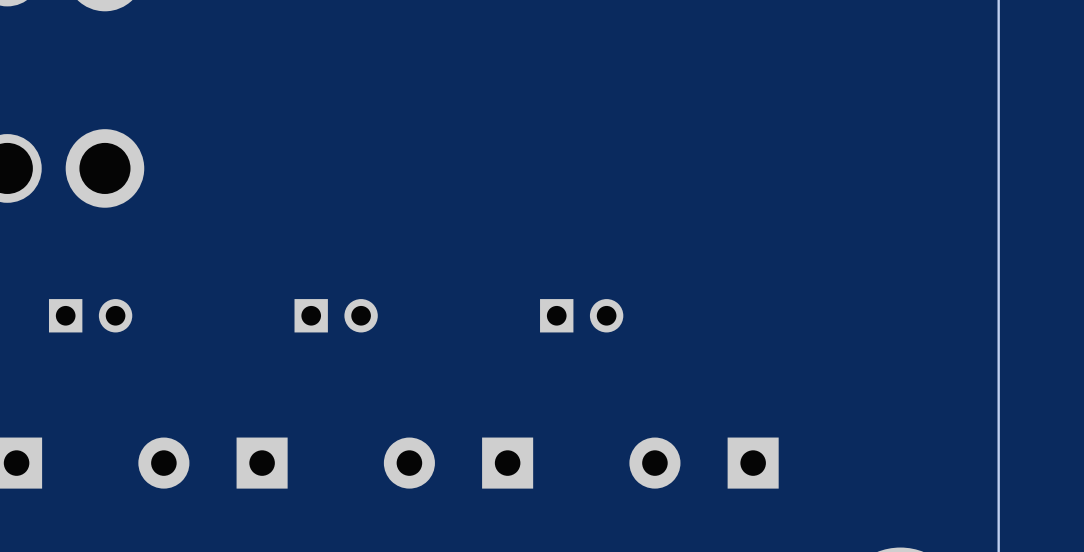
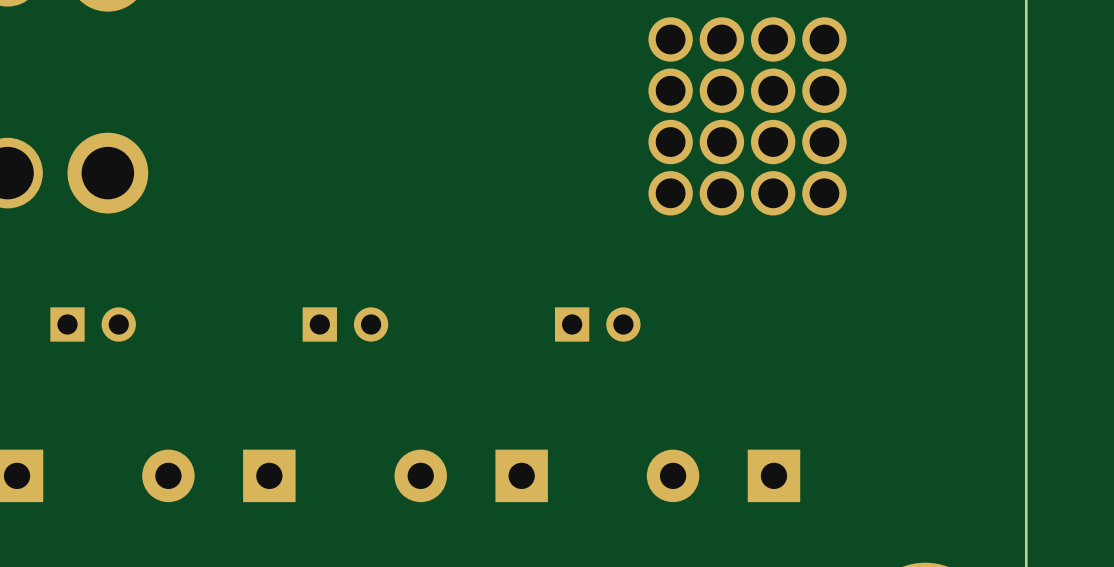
part: none -> (747, 116)

